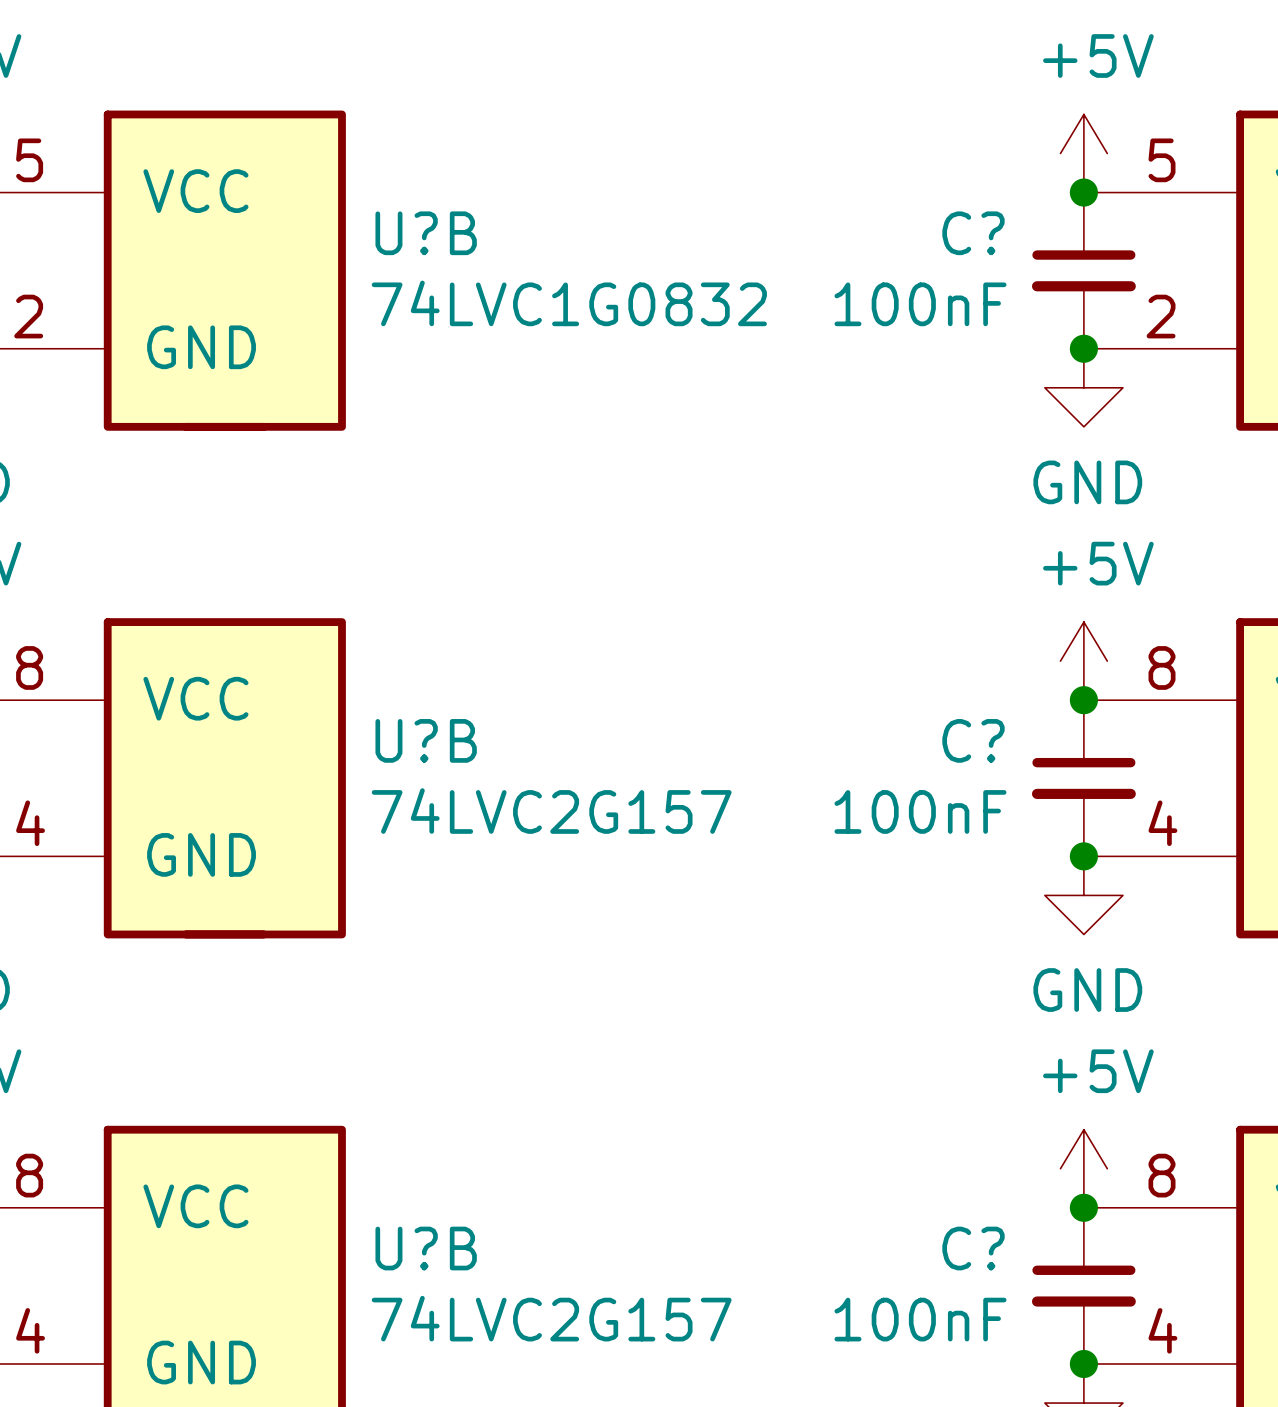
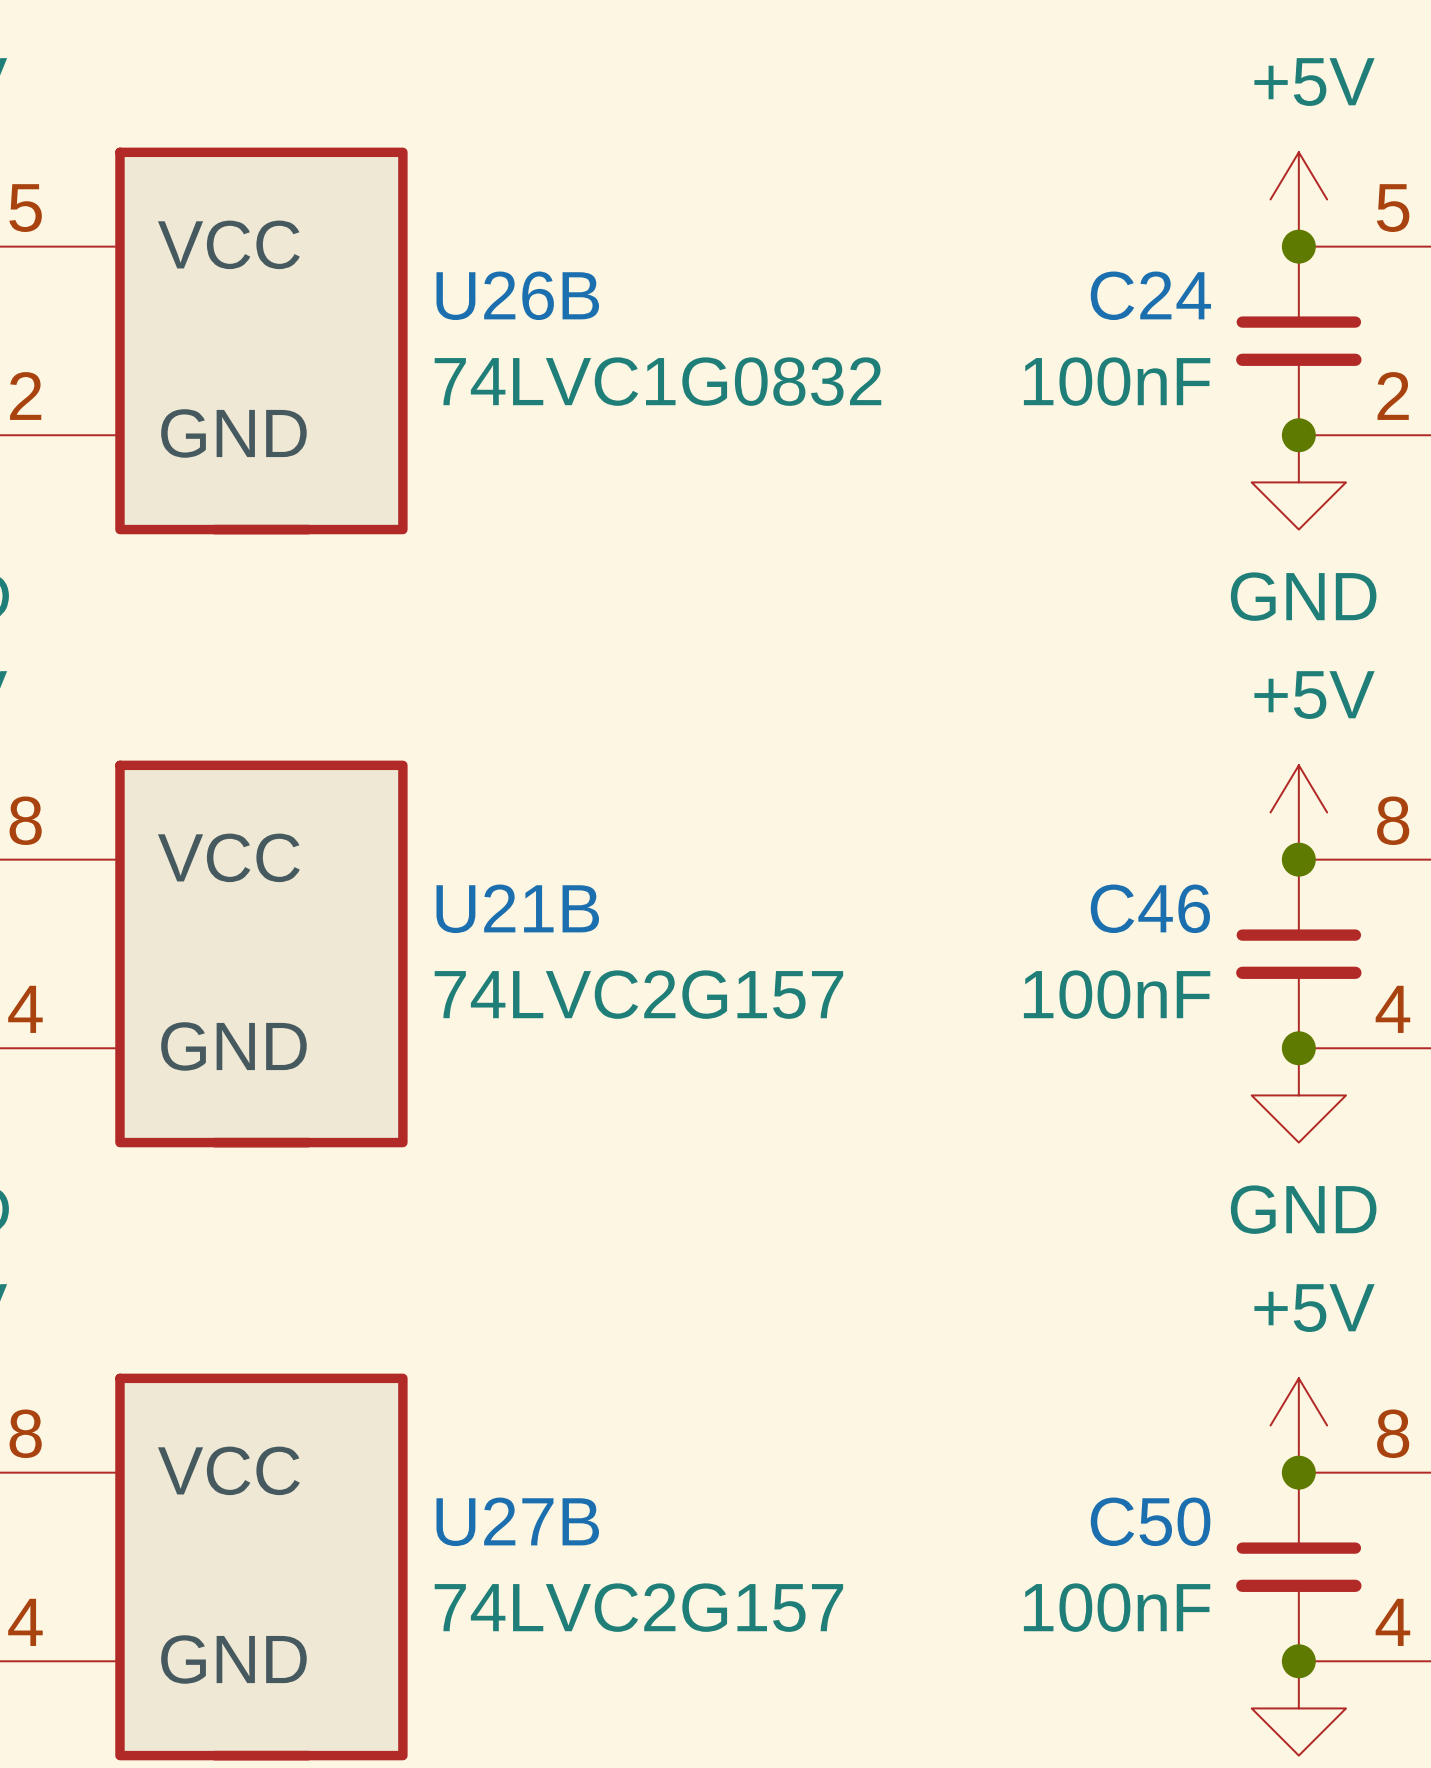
U?B name: U?B (426, 233) -> U26B (517, 295)
C? name: C? (973, 233) -> C24 (1150, 295)
U?B name: U?B (426, 740) -> U21B (517, 908)
C? name: C? (973, 740) -> C46 (1150, 908)
U?B name: U?B (426, 1248) -> U27B (517, 1521)
C? name: C? (973, 1248) -> C50 (1150, 1521)

